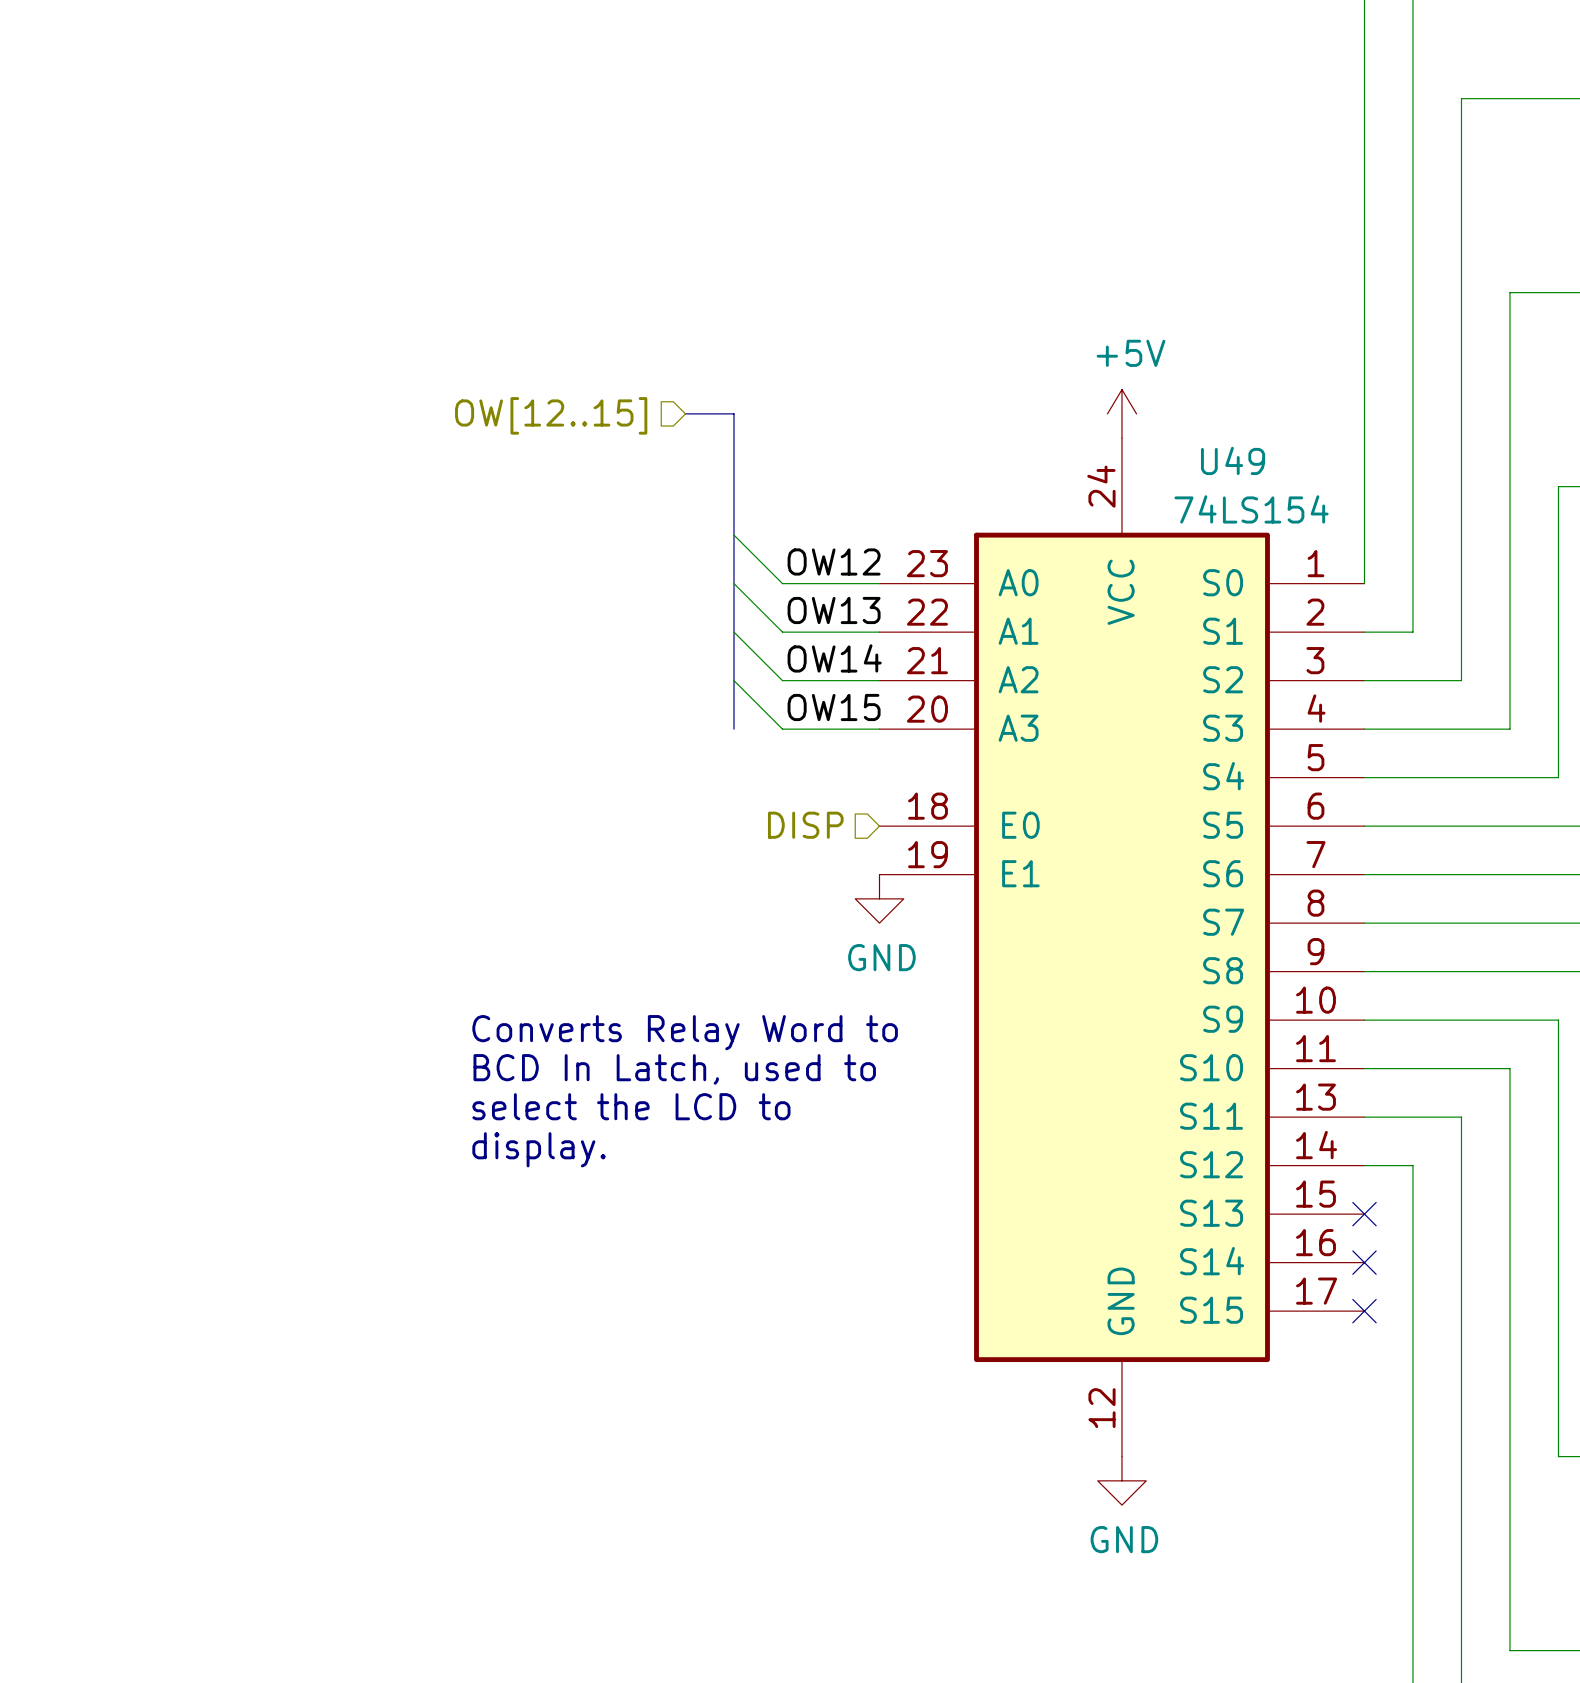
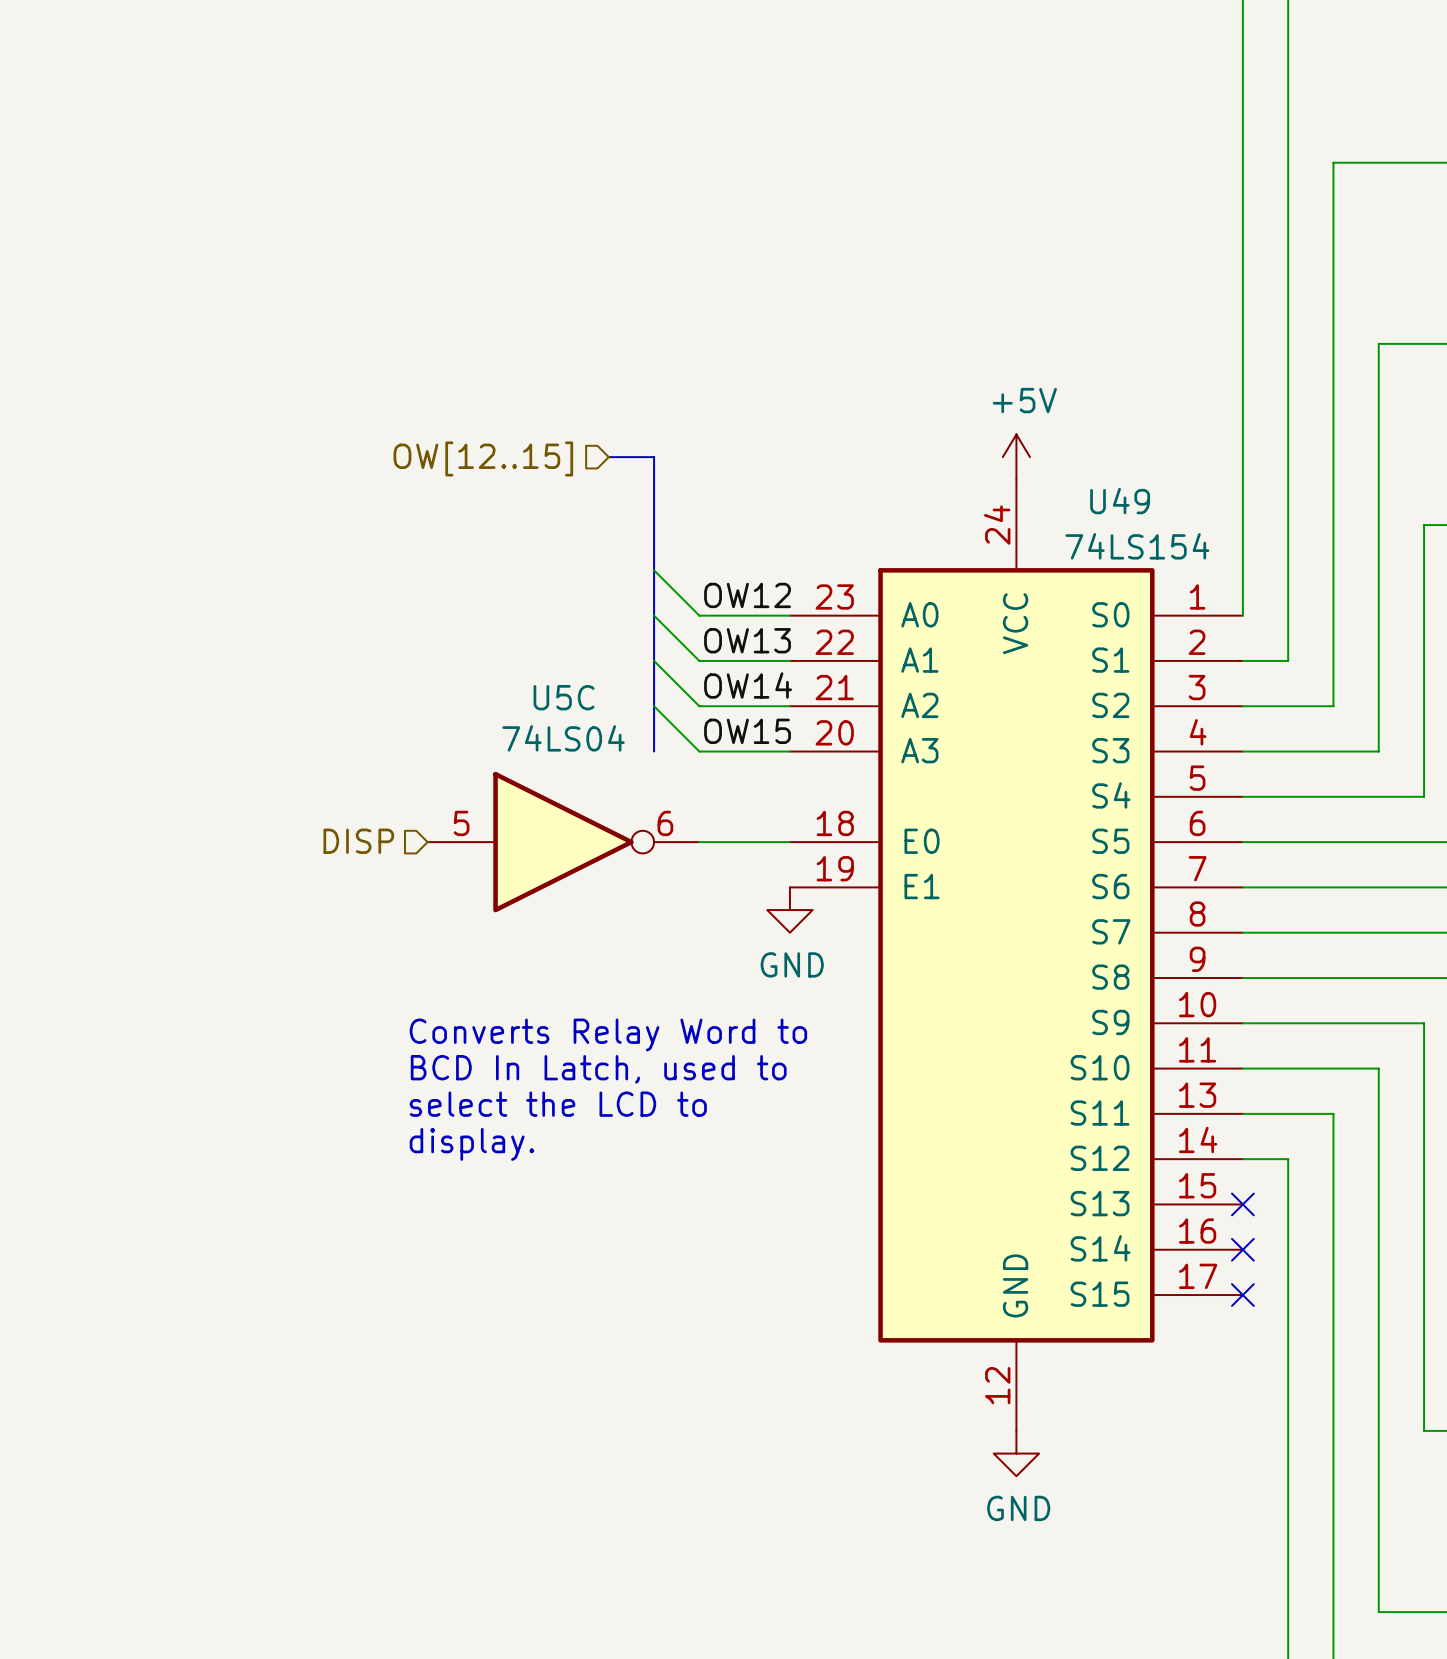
hierarchical label position: DISP (805, 825) -> DISP (358, 841)
U5C: none -> 74LS04 (563, 842)
wire: none -> (699, 842) (789, 842)

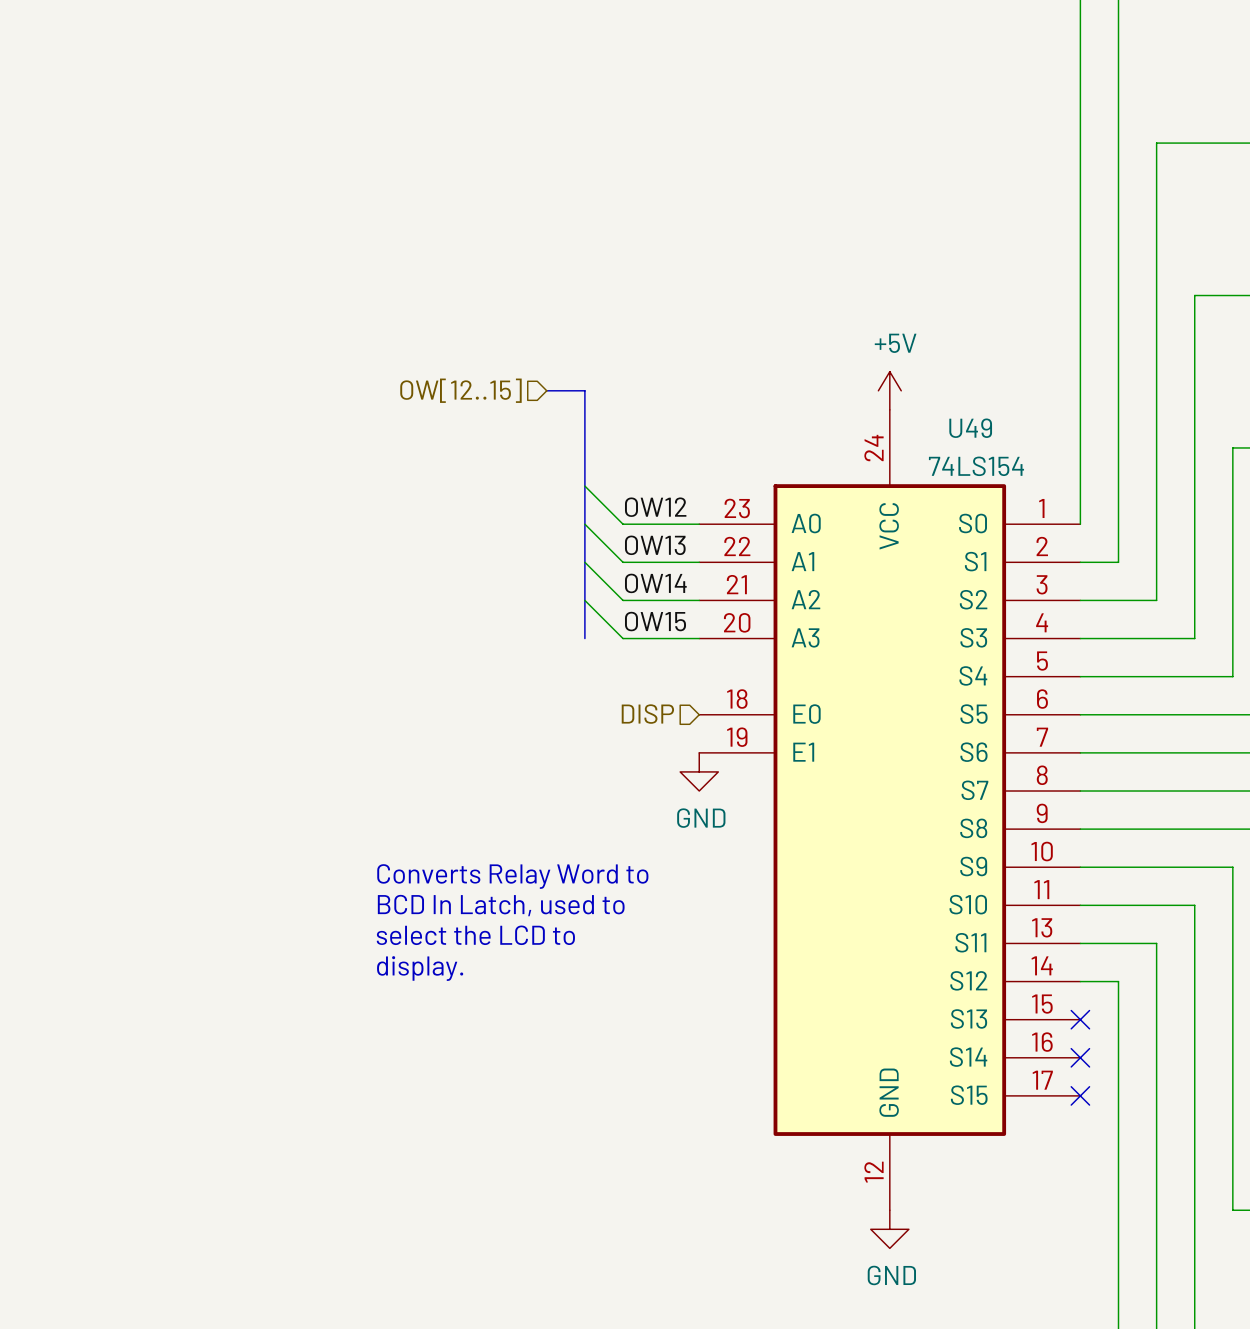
hierarchical label position: DISP (358, 841) -> DISP (647, 714)
U5C: 74LS04 (563, 842) -> none
wire: (699, 842) (789, 842) -> none

